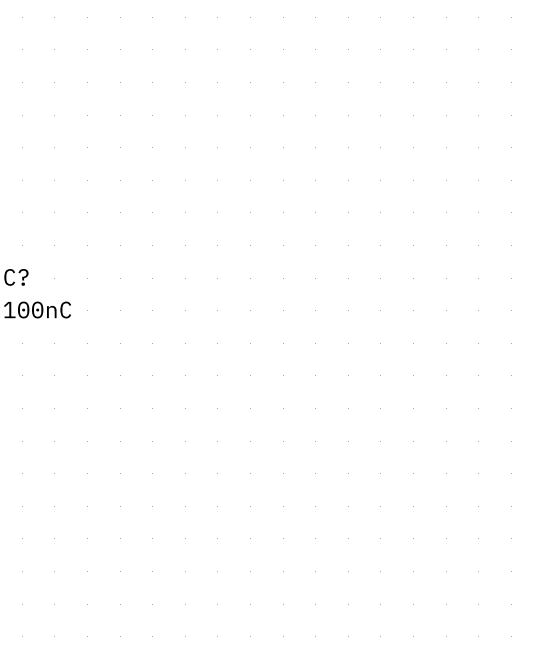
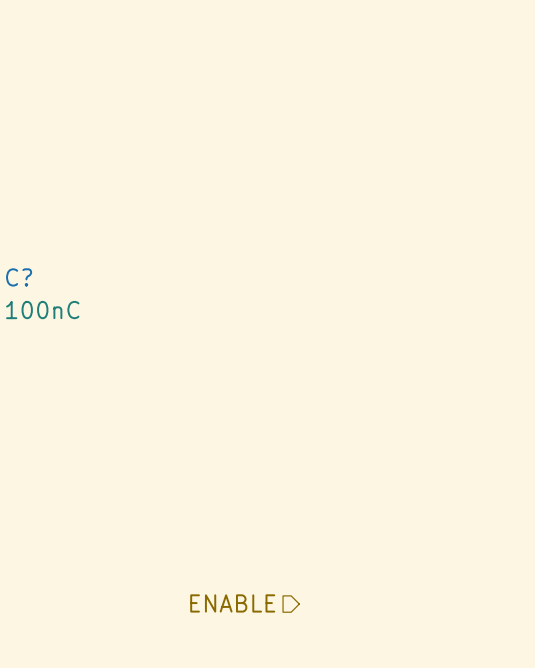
hierarchical label: none -> ENABLE (232, 603)

